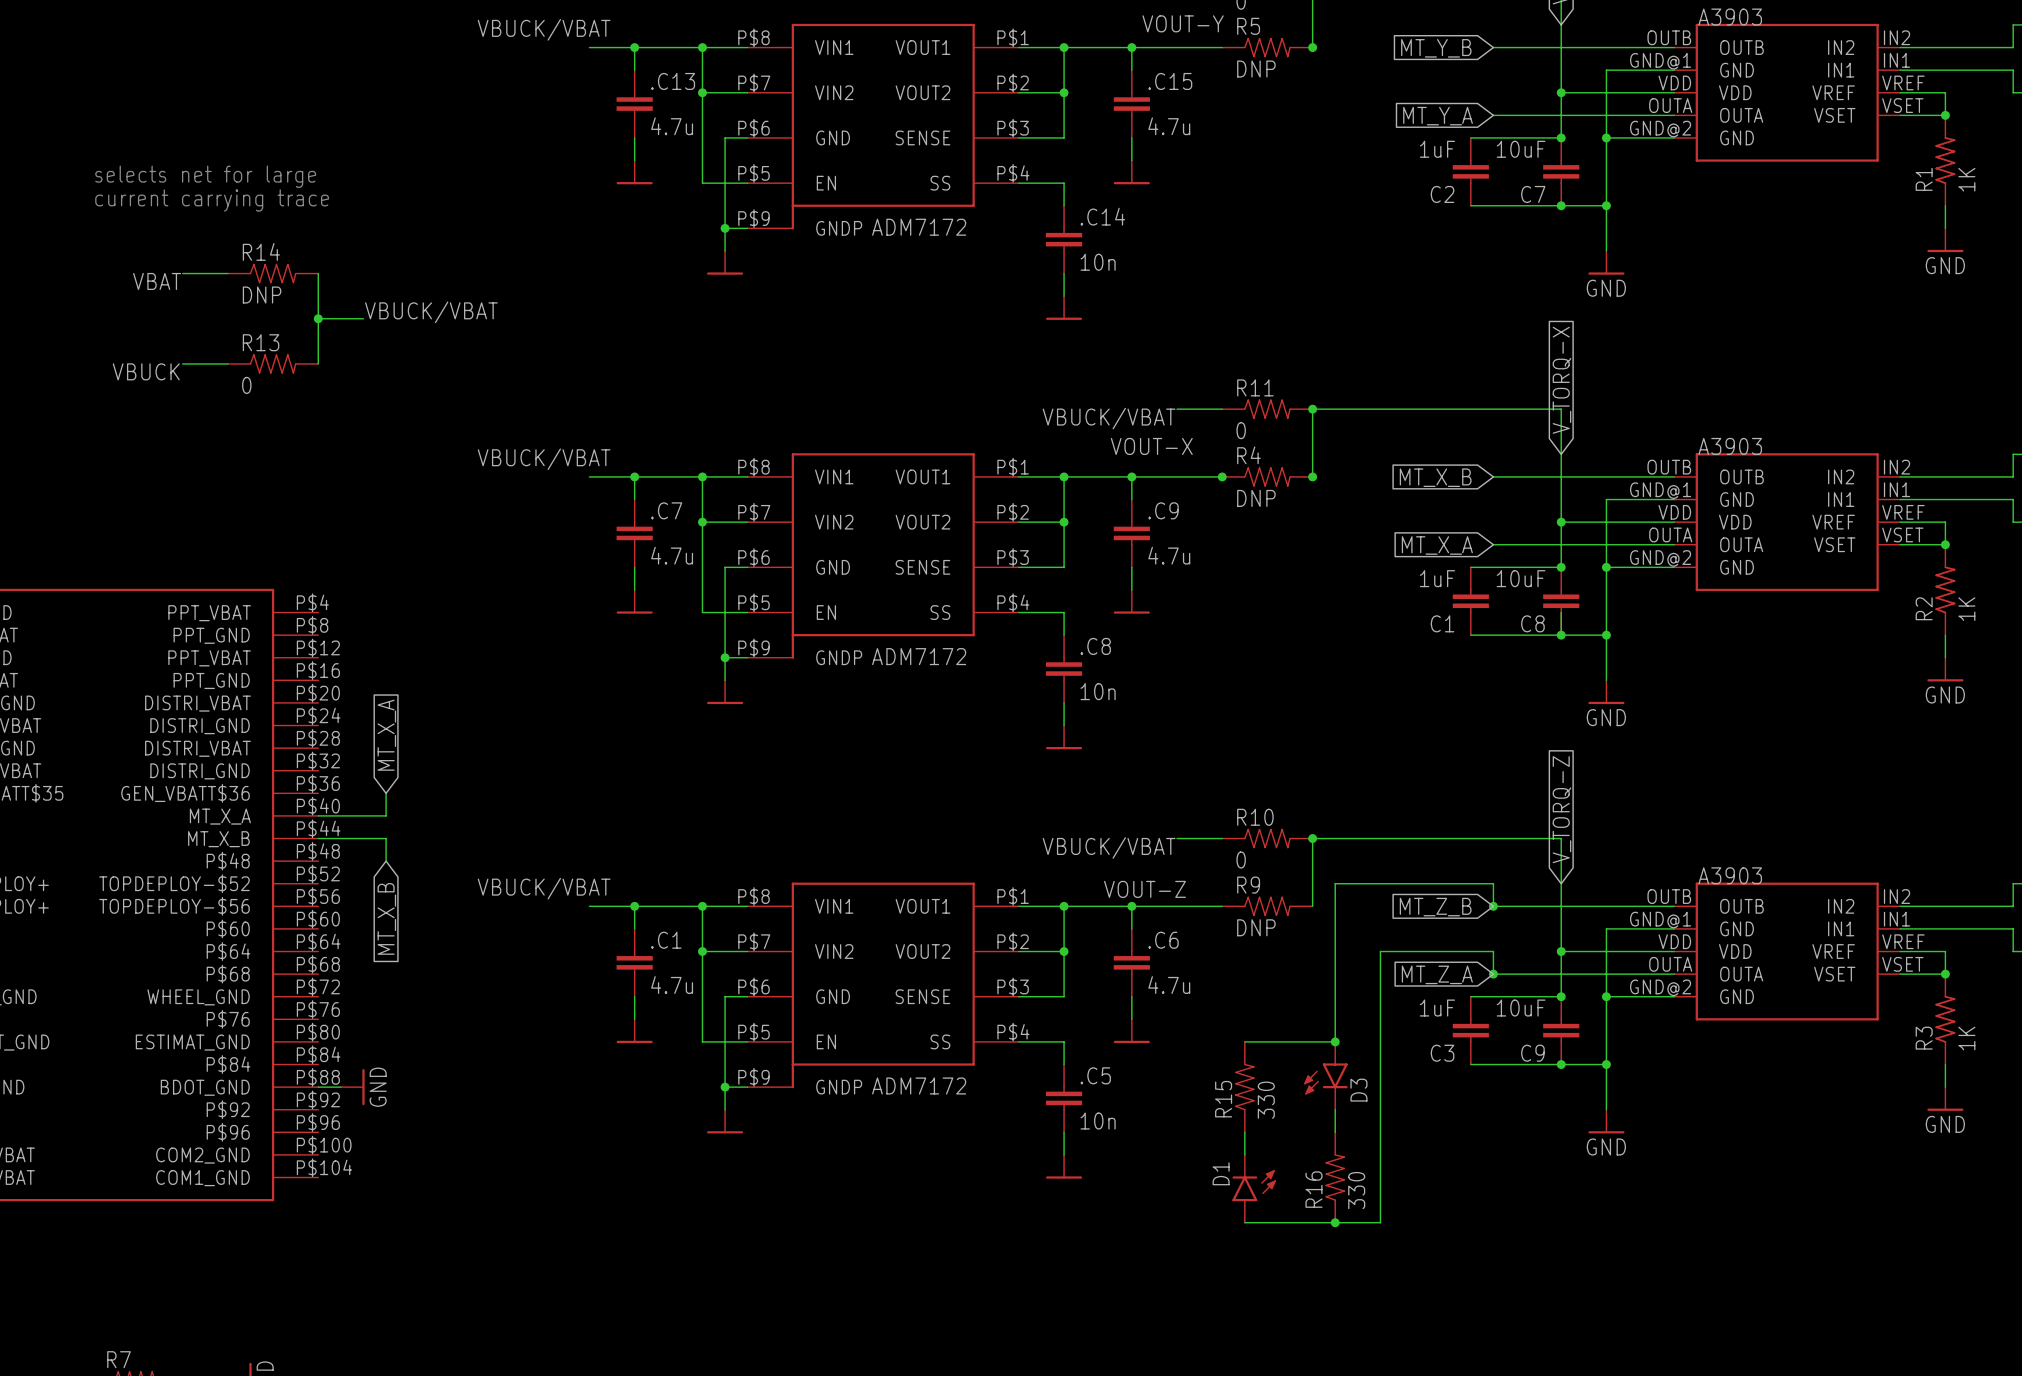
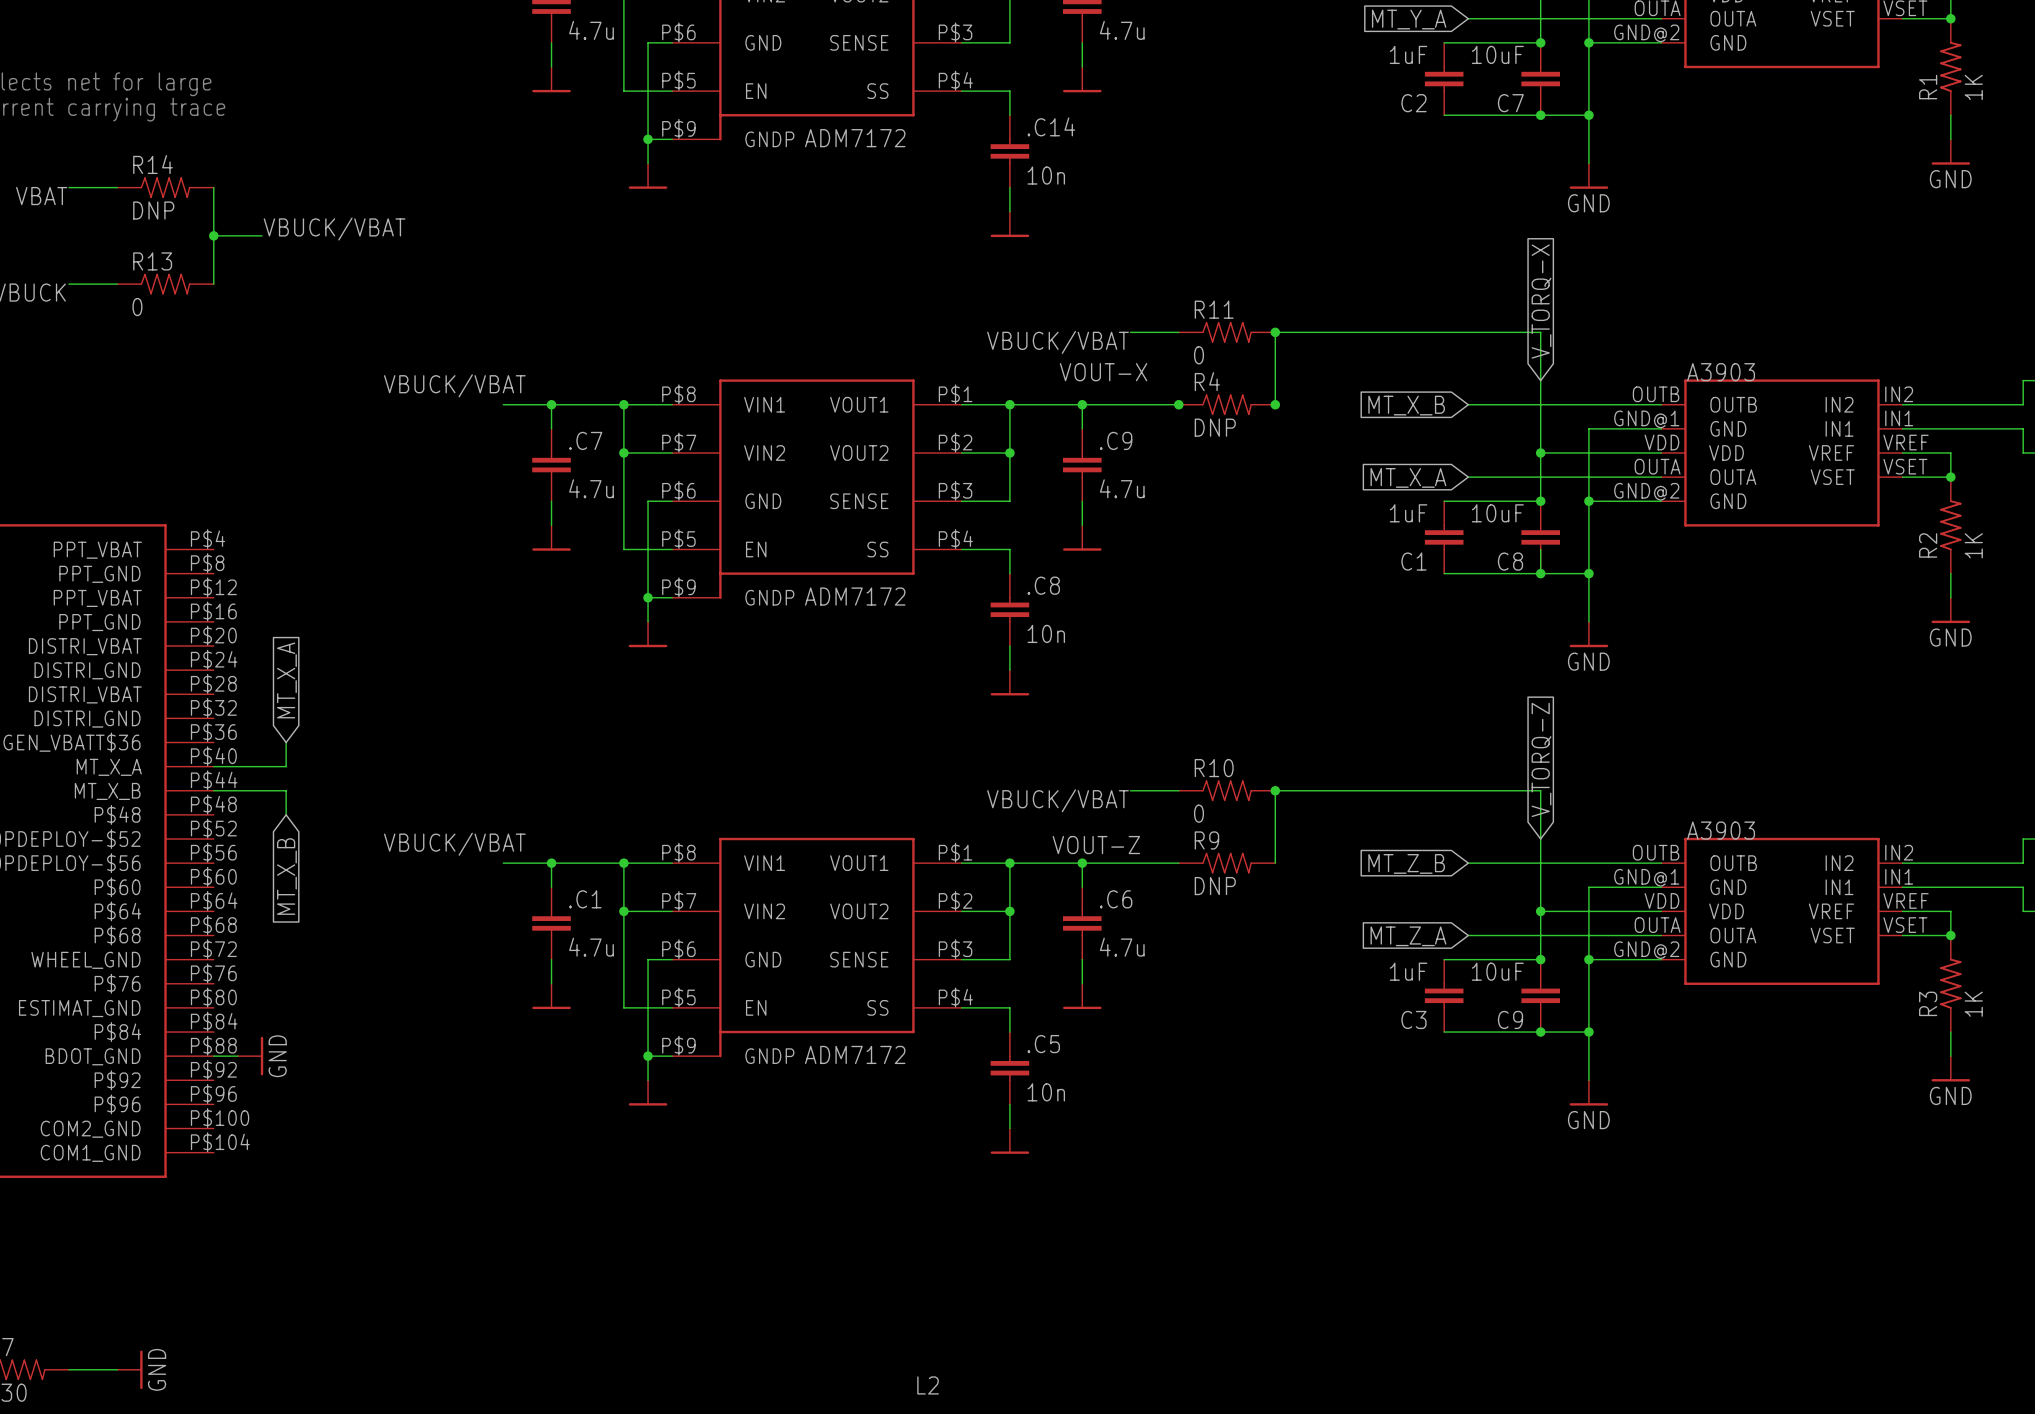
wire: (1493, 906) (1493, 883) (1335, 883) (1335, 1041) (1244, 1041) -> none
junction: (1493, 906) -> none
wire: (1493, 974) (1493, 951) (1380, 951) (1380, 1222) (1244, 1222) -> none
junction: (1493, 974) -> none
junction: (1335, 1041) -> none
D3: (1325, 1075) -> none
R15: 330 (1244, 1087) -> none
wire: (1335, 1109) (1335, 1132) -> none
wire: (1244, 1132) (1244, 1154) -> none
R16: 330 (1335, 1177) -> none
D1: (1254, 1188) -> none
junction: (1335, 1222) -> none

